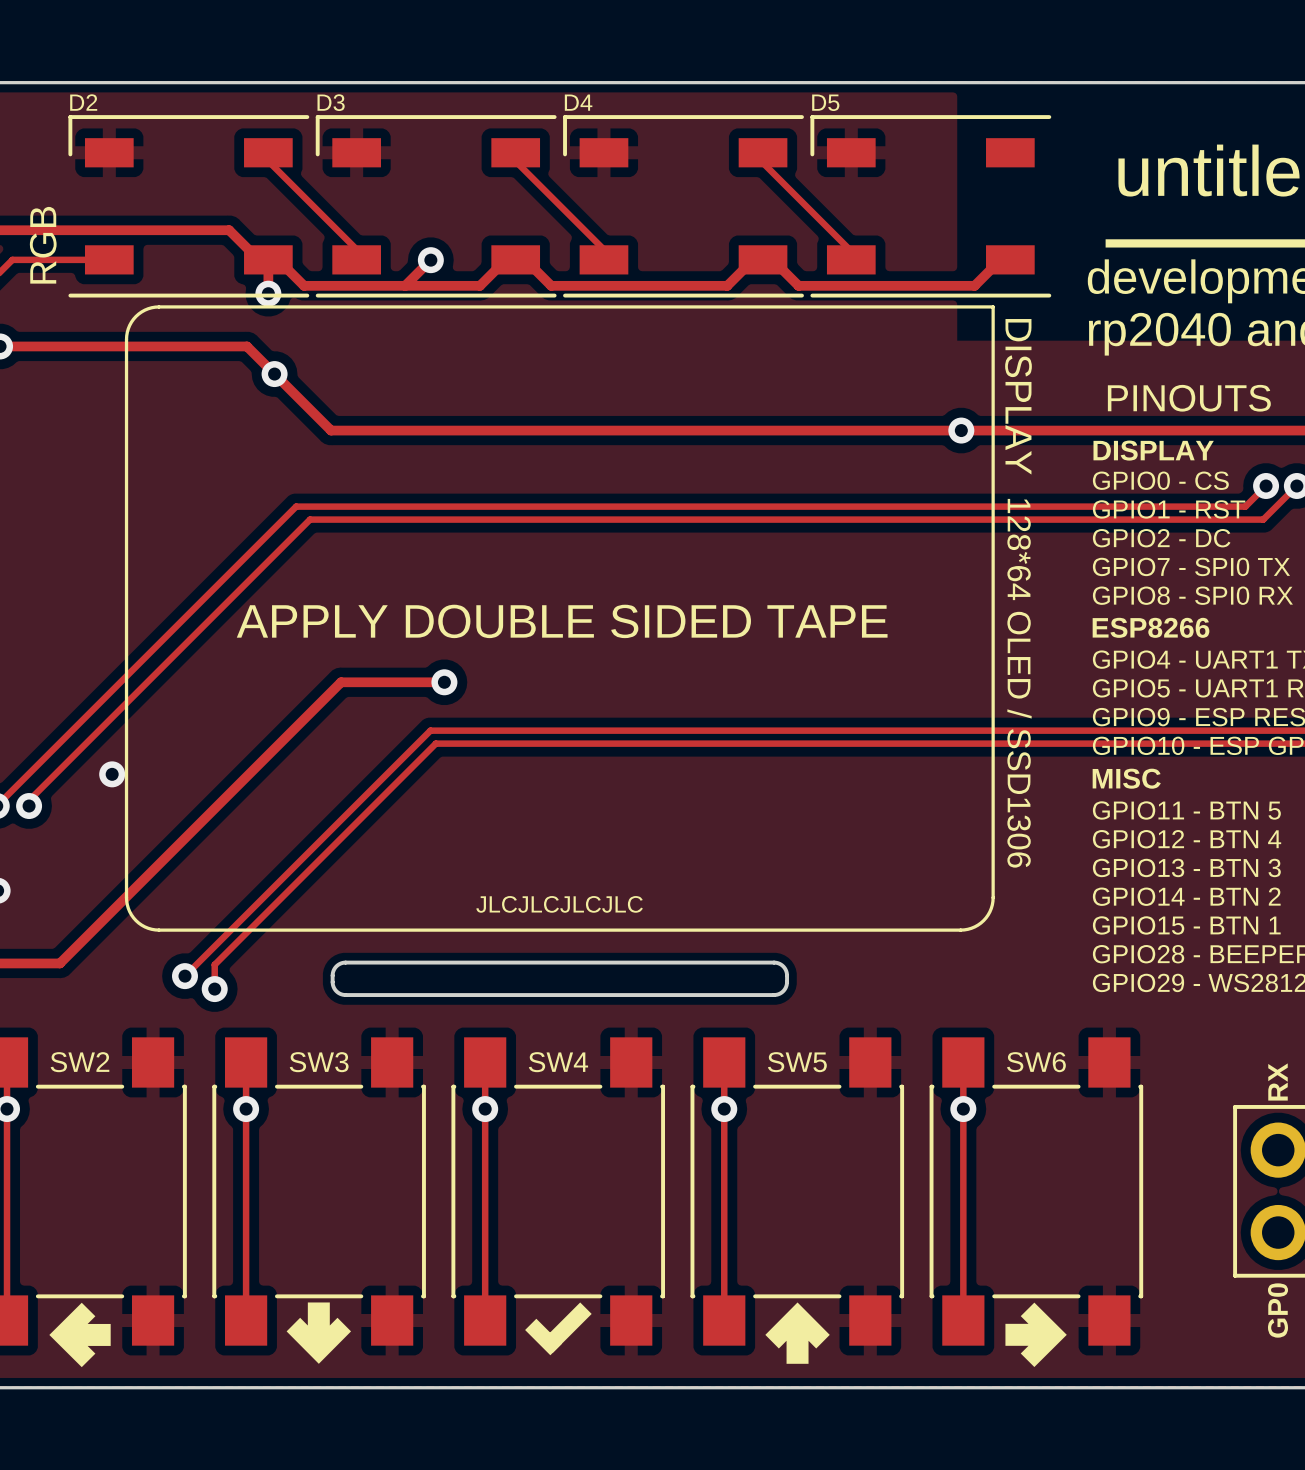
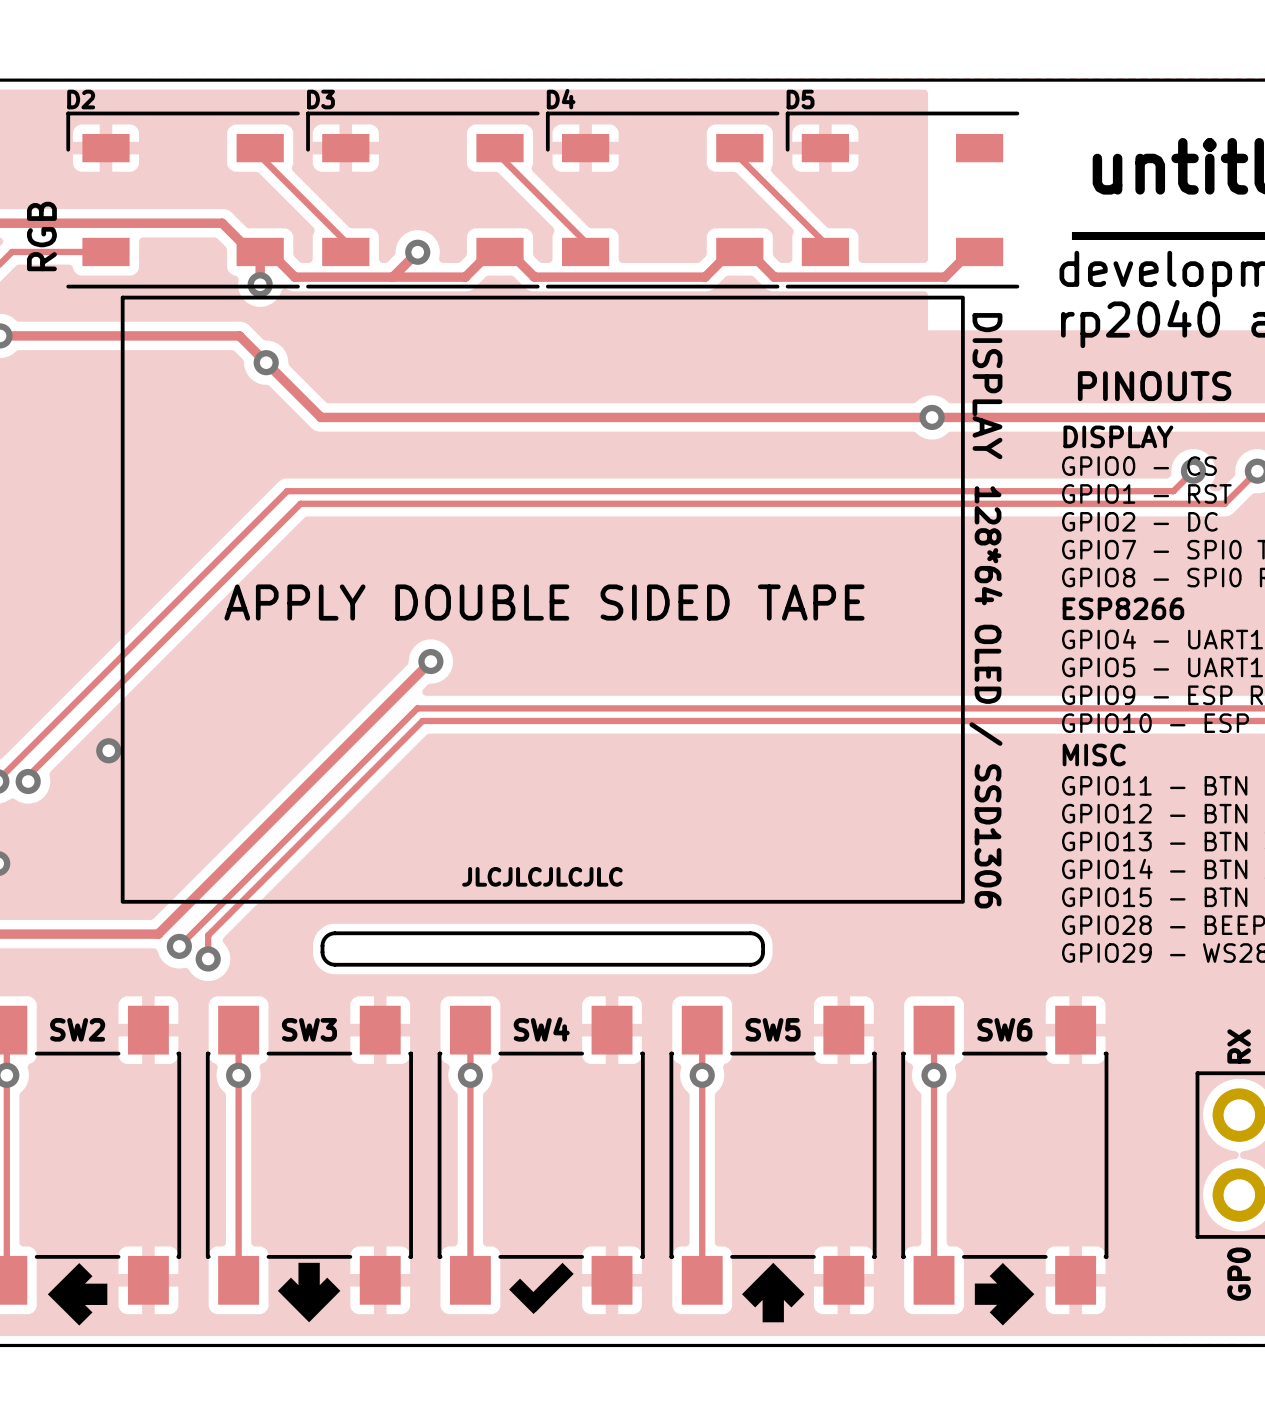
part footprint: [124, 305, 995, 997] -> [120, 295, 965, 967]
track: (1266, 485) (1245, 506) (1210, 506) -> (1193, 471) (1173, 491)
via position: (1266, 485) -> (1193, 471)
track: (444, 682) (341, 682) (59, 963) -> (430, 661) (158, 934) (58, 934)

